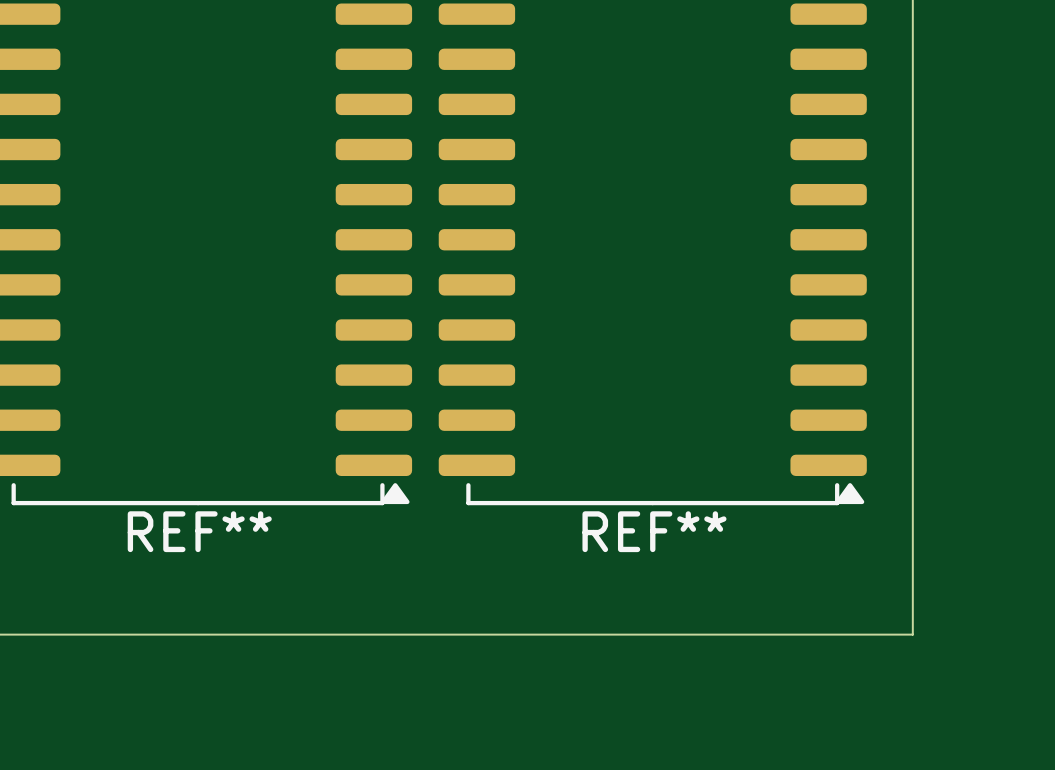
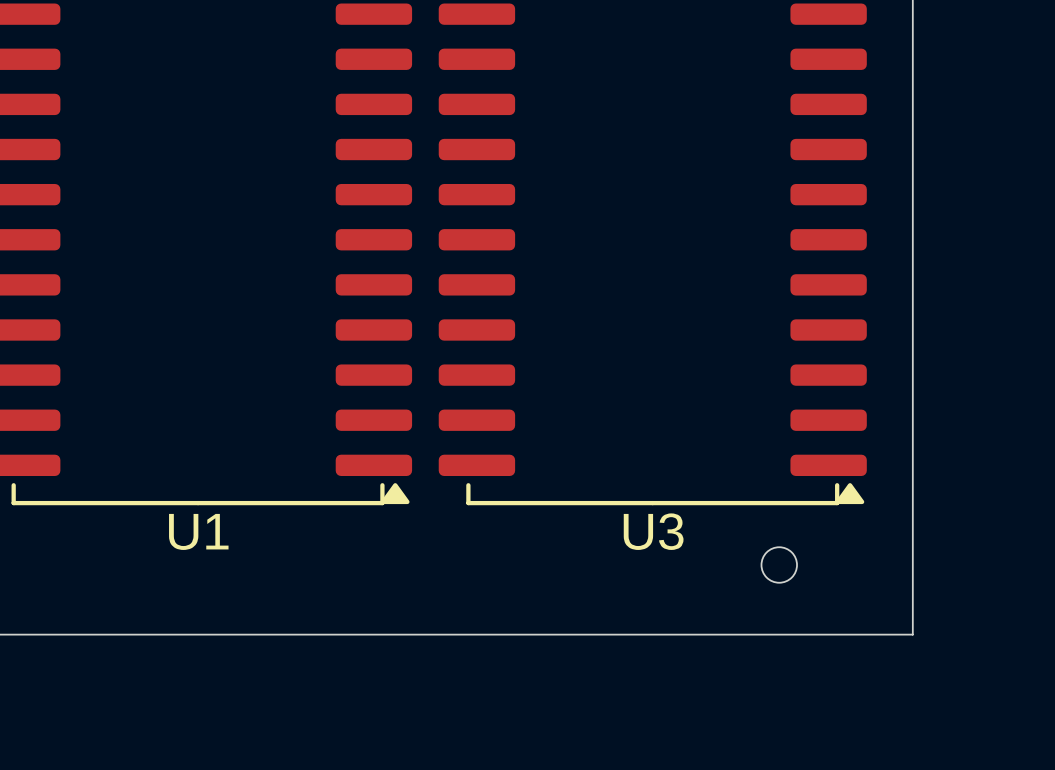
REF** name: REF** (199, 531) -> U1 (198, 531)
REF** name: REF** (654, 531) -> U3 (653, 531)
round board edge: none -> [760, 546, 798, 584]

